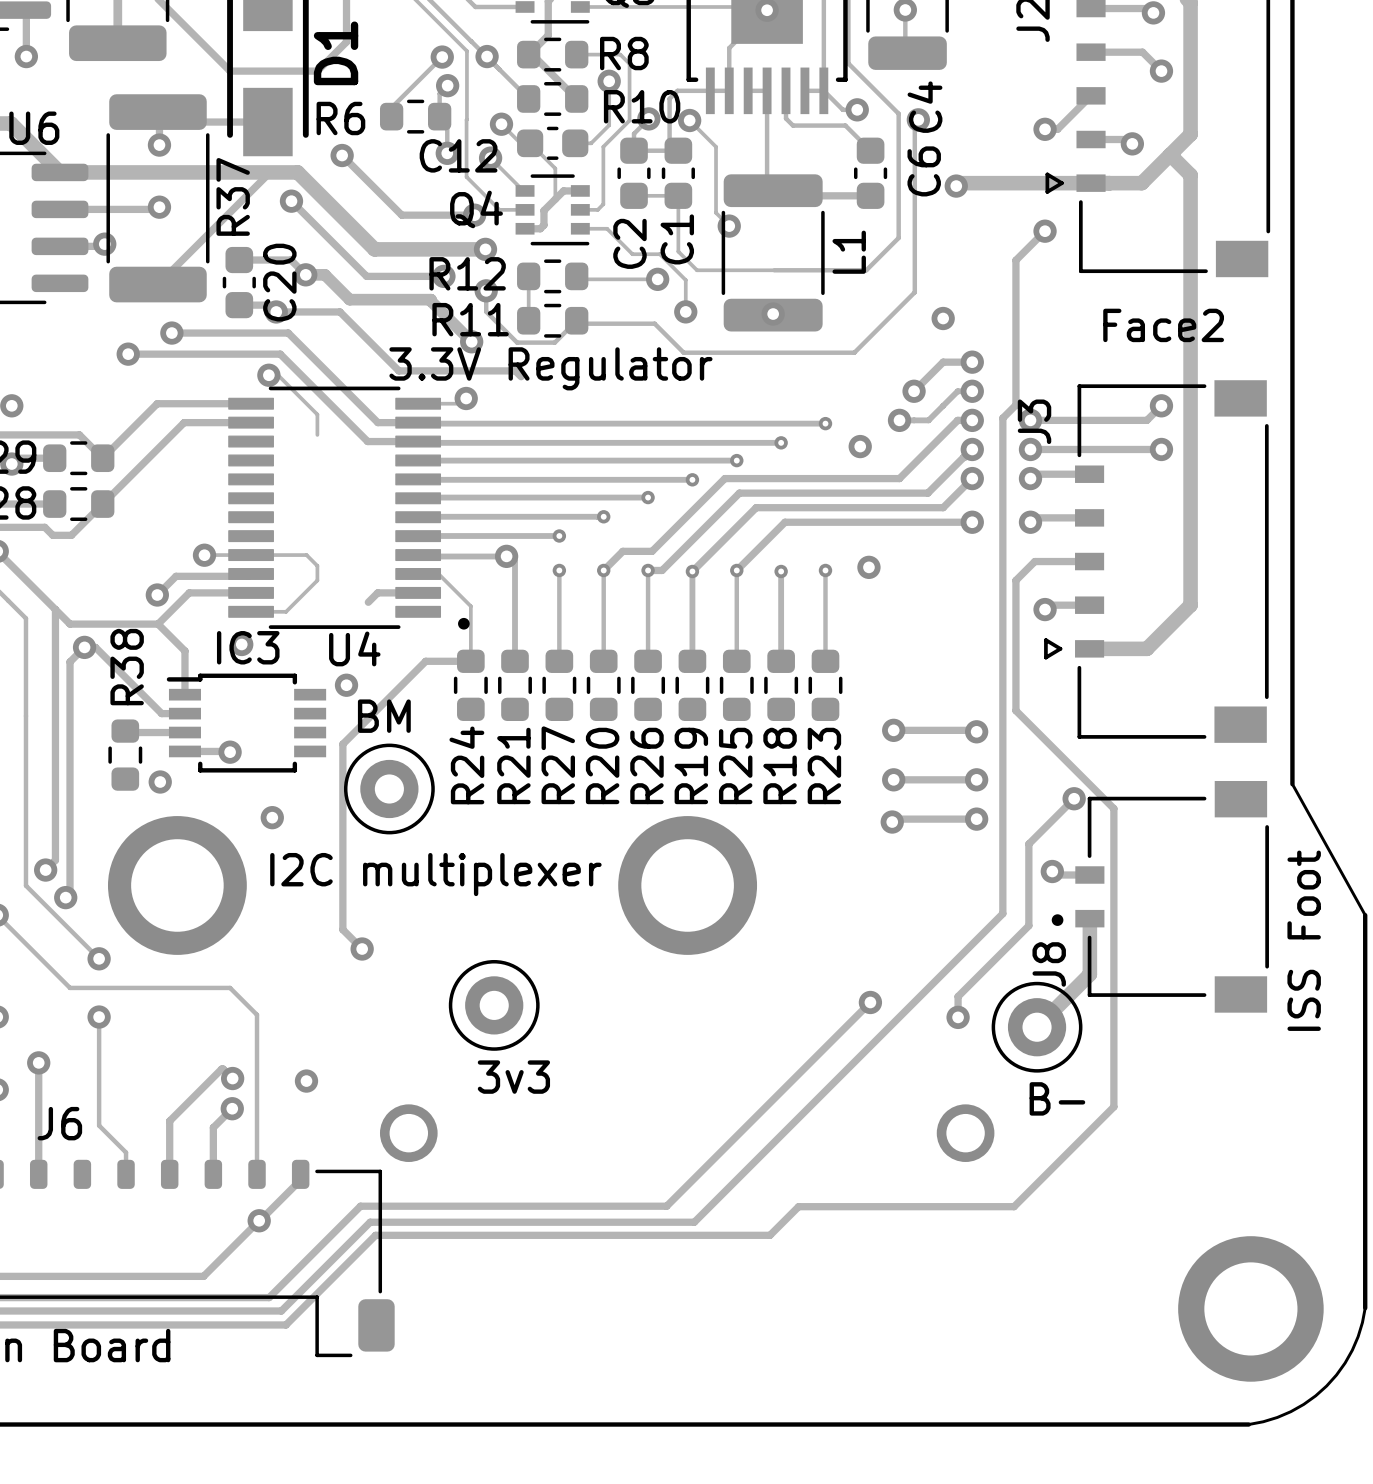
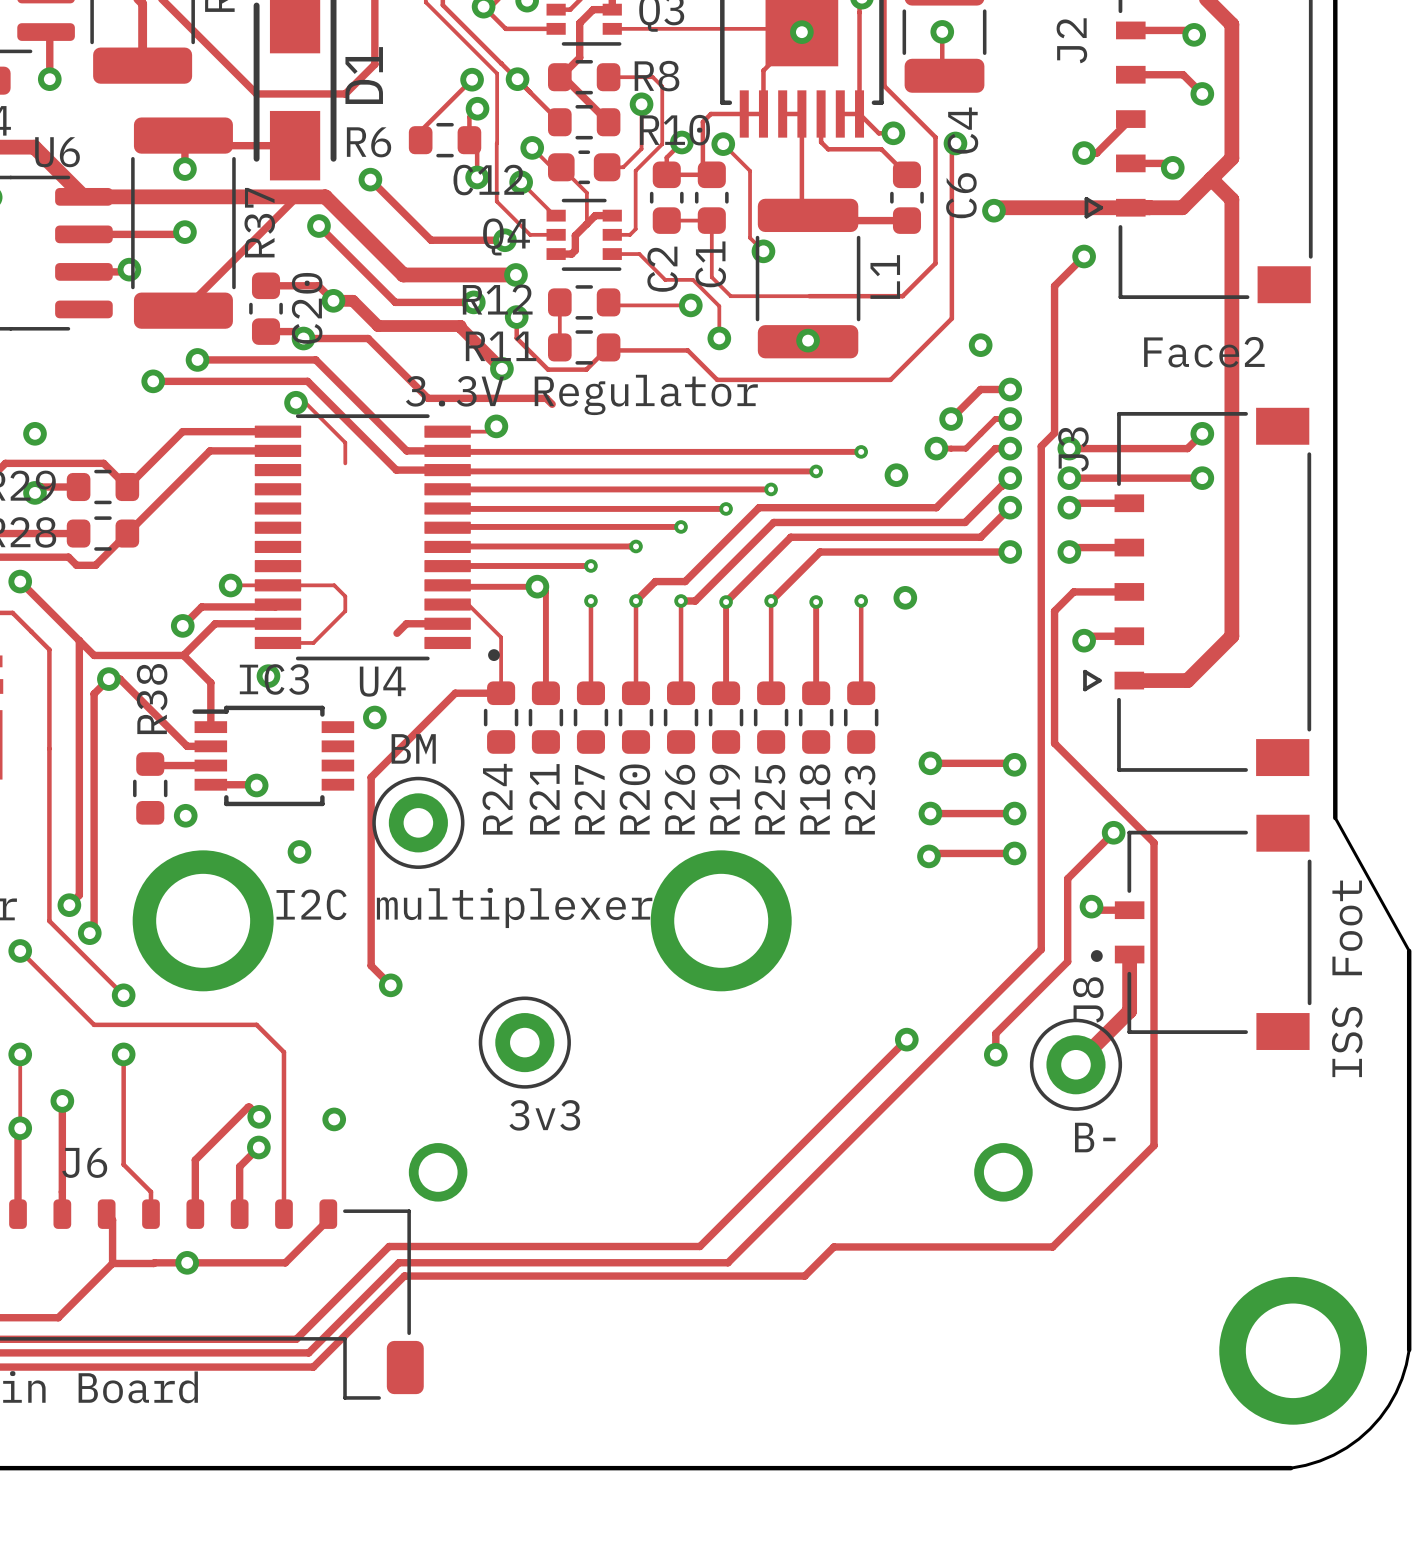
track: none -> (106, 1214) (112, 1220) (112, 1263)
track: (259, 1220) (203, 1276) (34, 1276) -> (112, 1263) (58, 1317)
via position: (259, 1220) -> (187, 1262)
track: none -> (285, 1262) (112, 1263)

